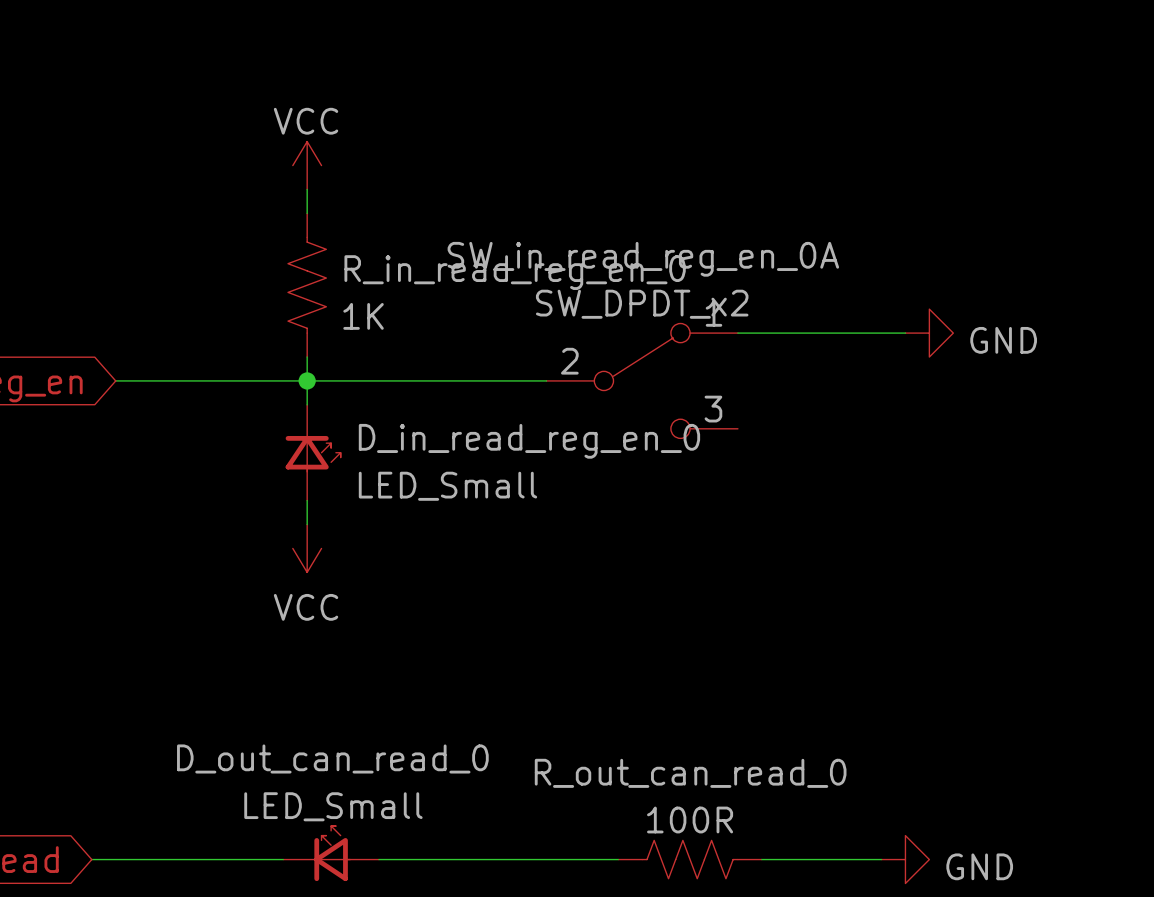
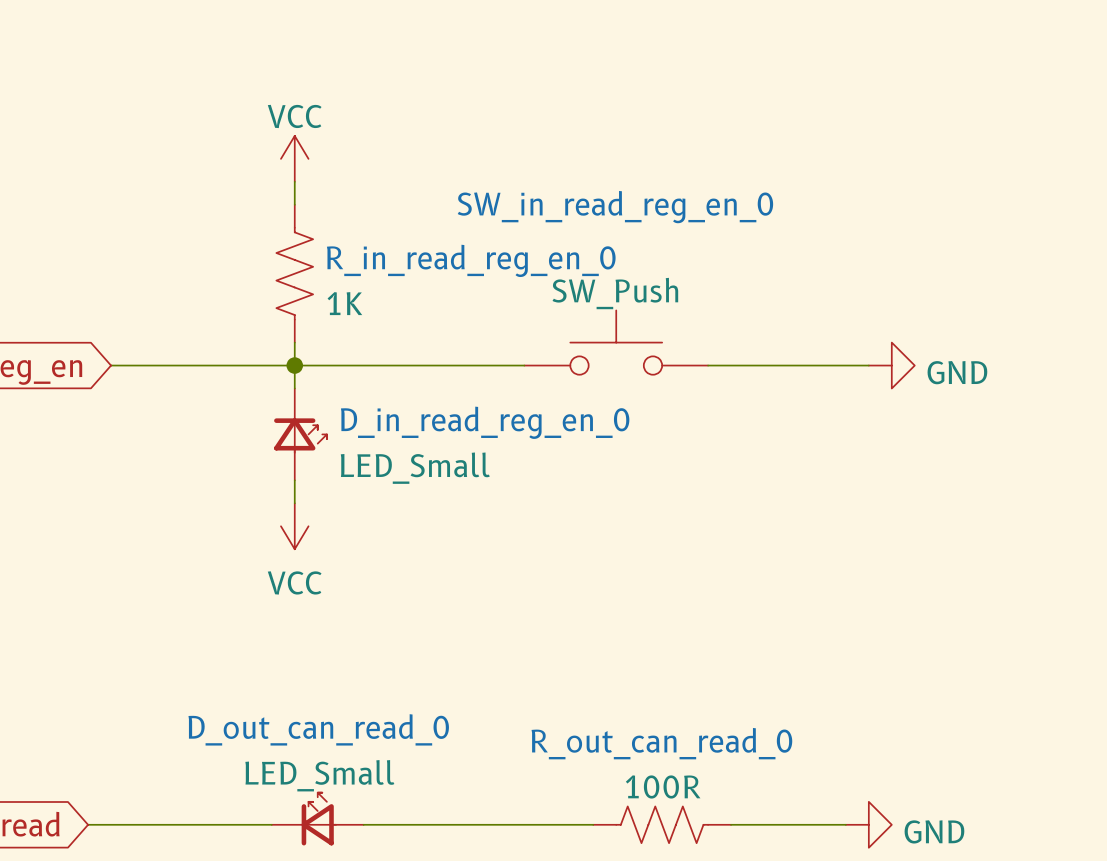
wire: (737, 333) (905, 333) -> (708, 365) (868, 365)
power symbol position: GND (929, 333) -> GND (891, 365)
SW_in_read_reg_en_0: none -> SW_Push (616, 342)
SW_in_read_reg_en_0A: SW_DPDT_x2 (642, 380) -> none

